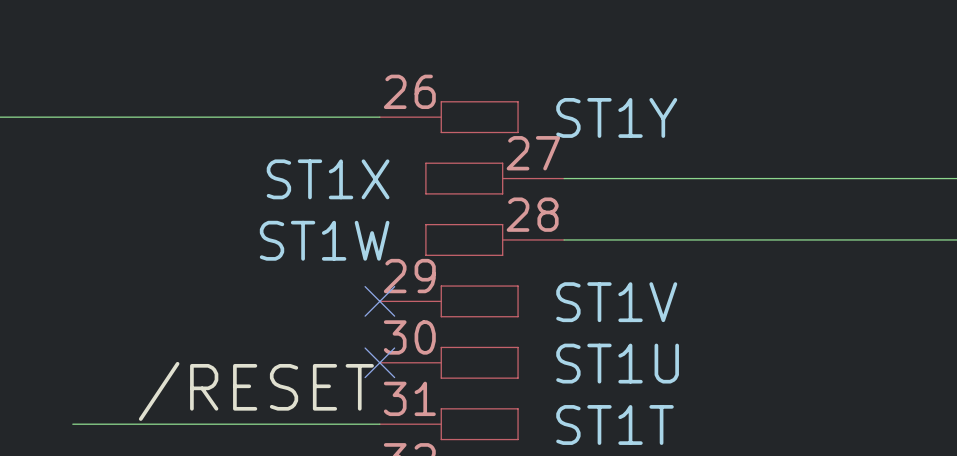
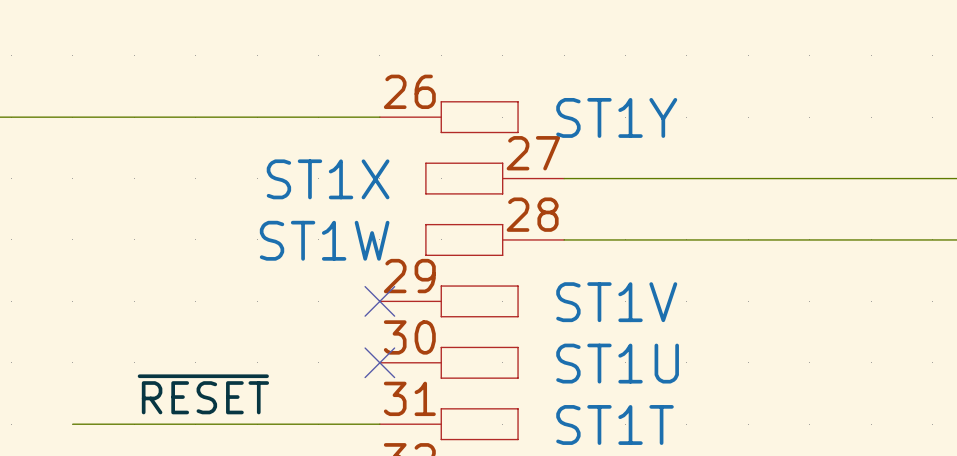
label: /RESET (256, 391) -> ~{RESET} (203, 394)

